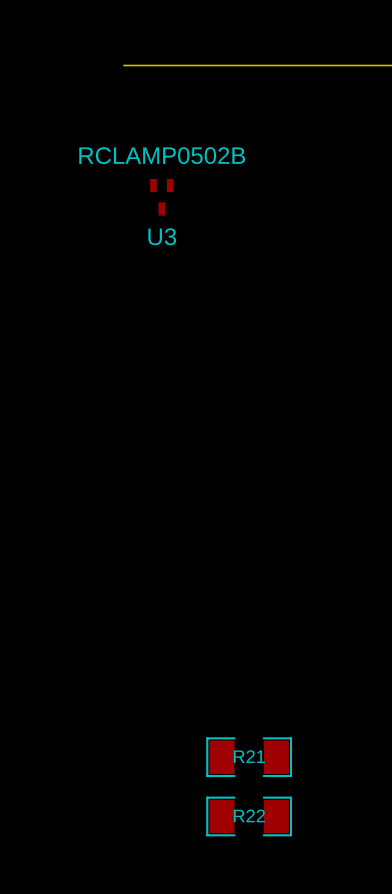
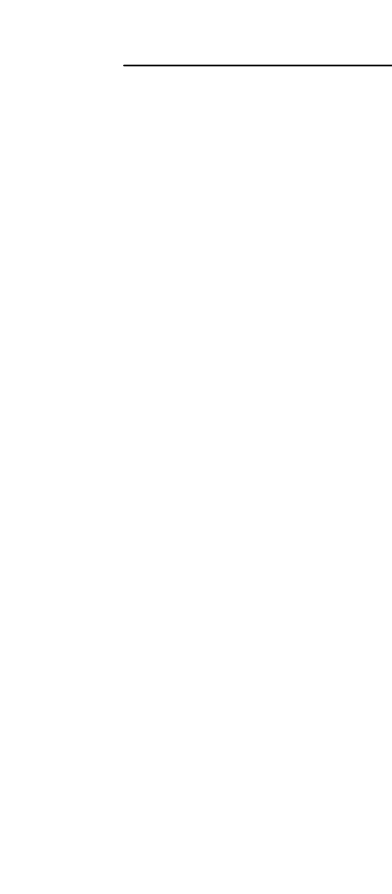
U3: RCLAMP0502B (161, 197) -> none
R21: (249, 757) -> none
R22: (249, 816) -> none

